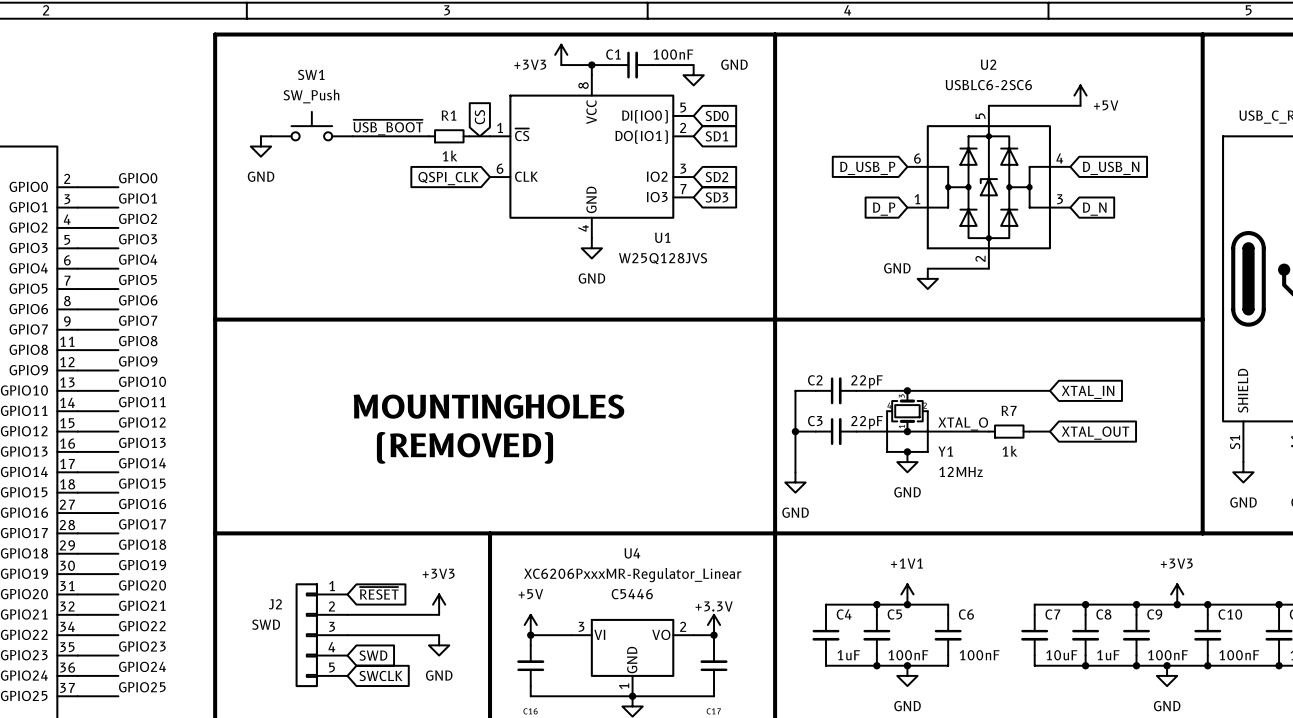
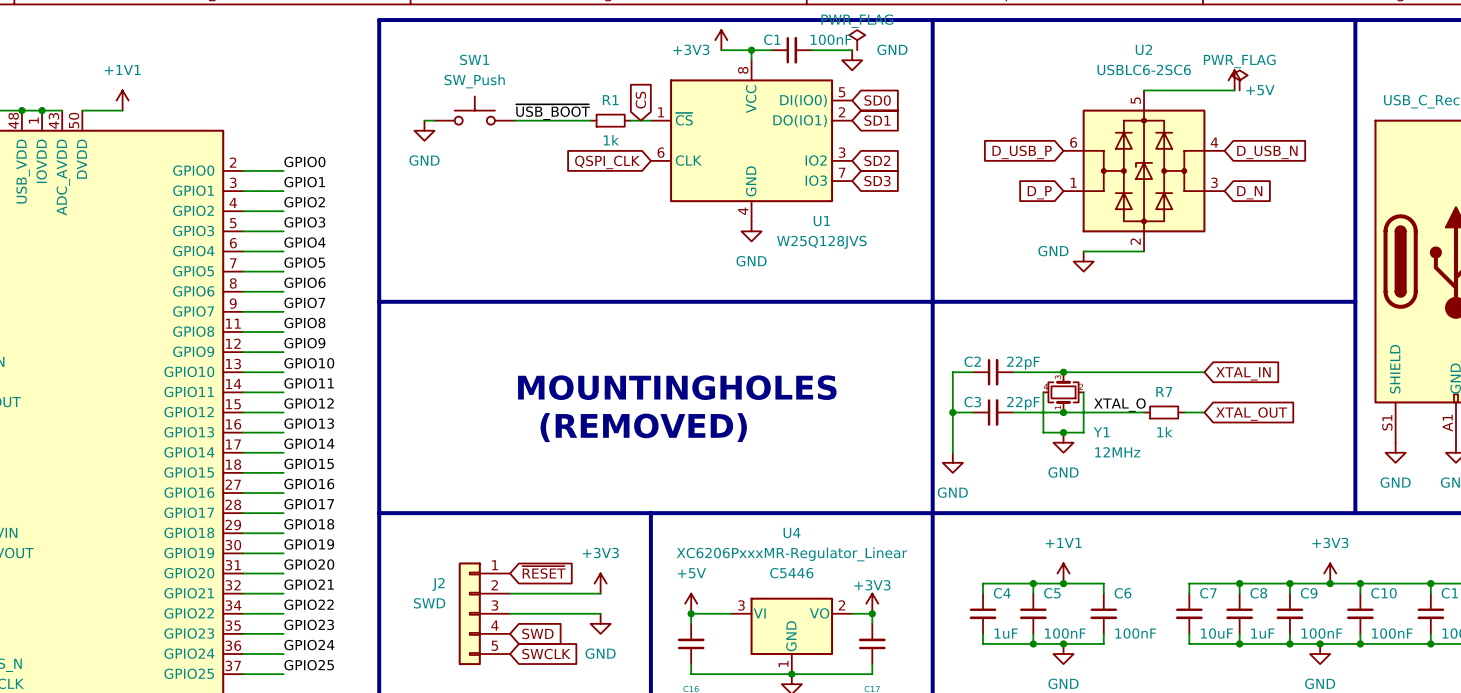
power symbol: none -> PWR_FLAG (857, 40)
power symbol: none -> PWR_FLAG (1239, 80)
power symbol: +3.3V (714, 625) -> +3V3 (872, 603)

